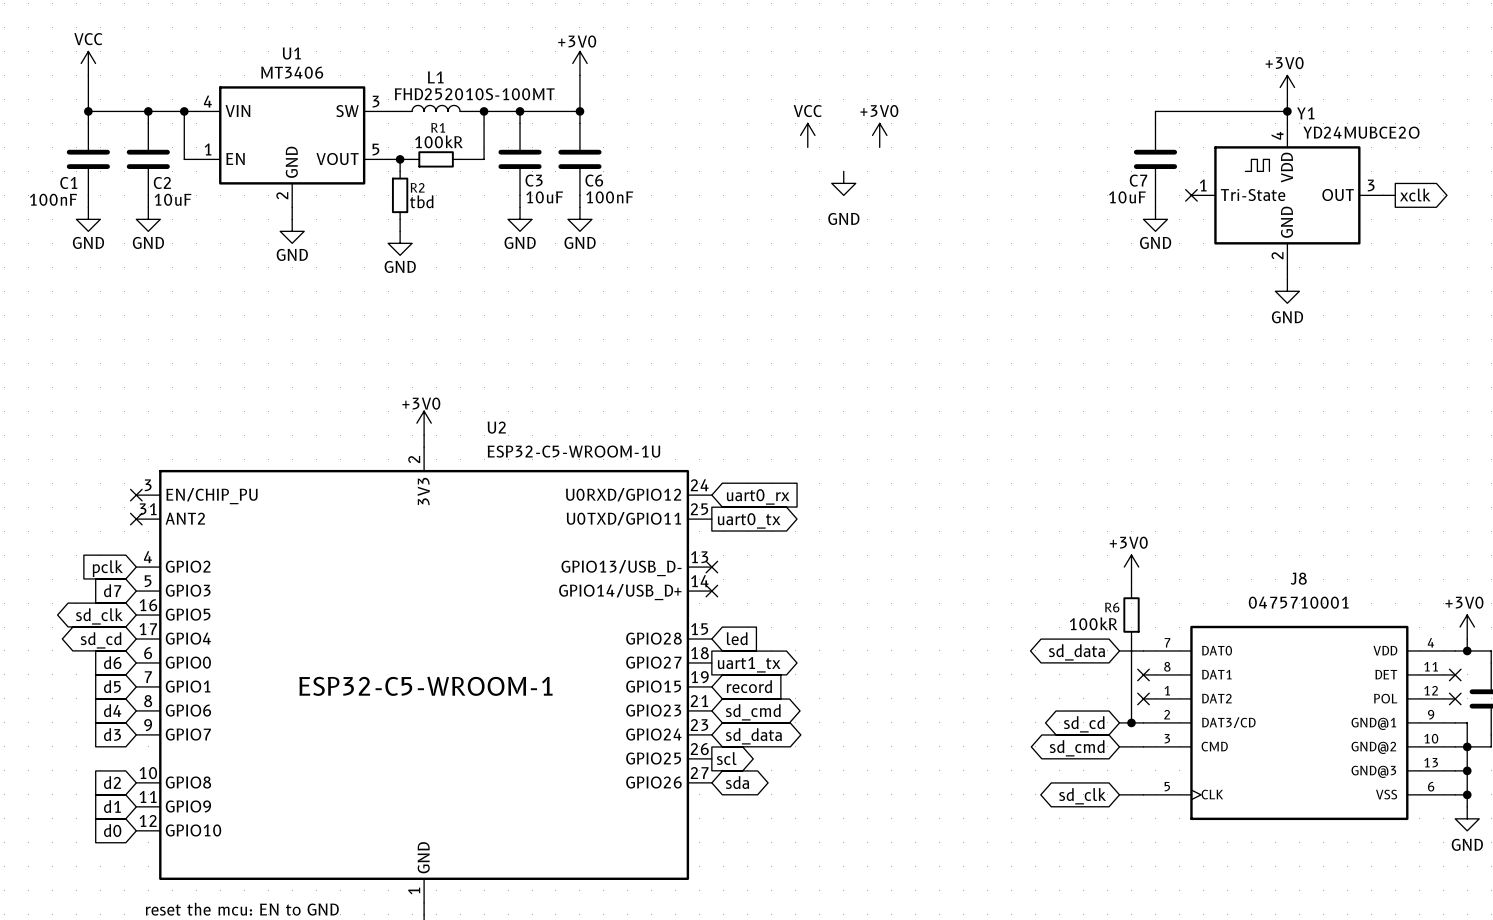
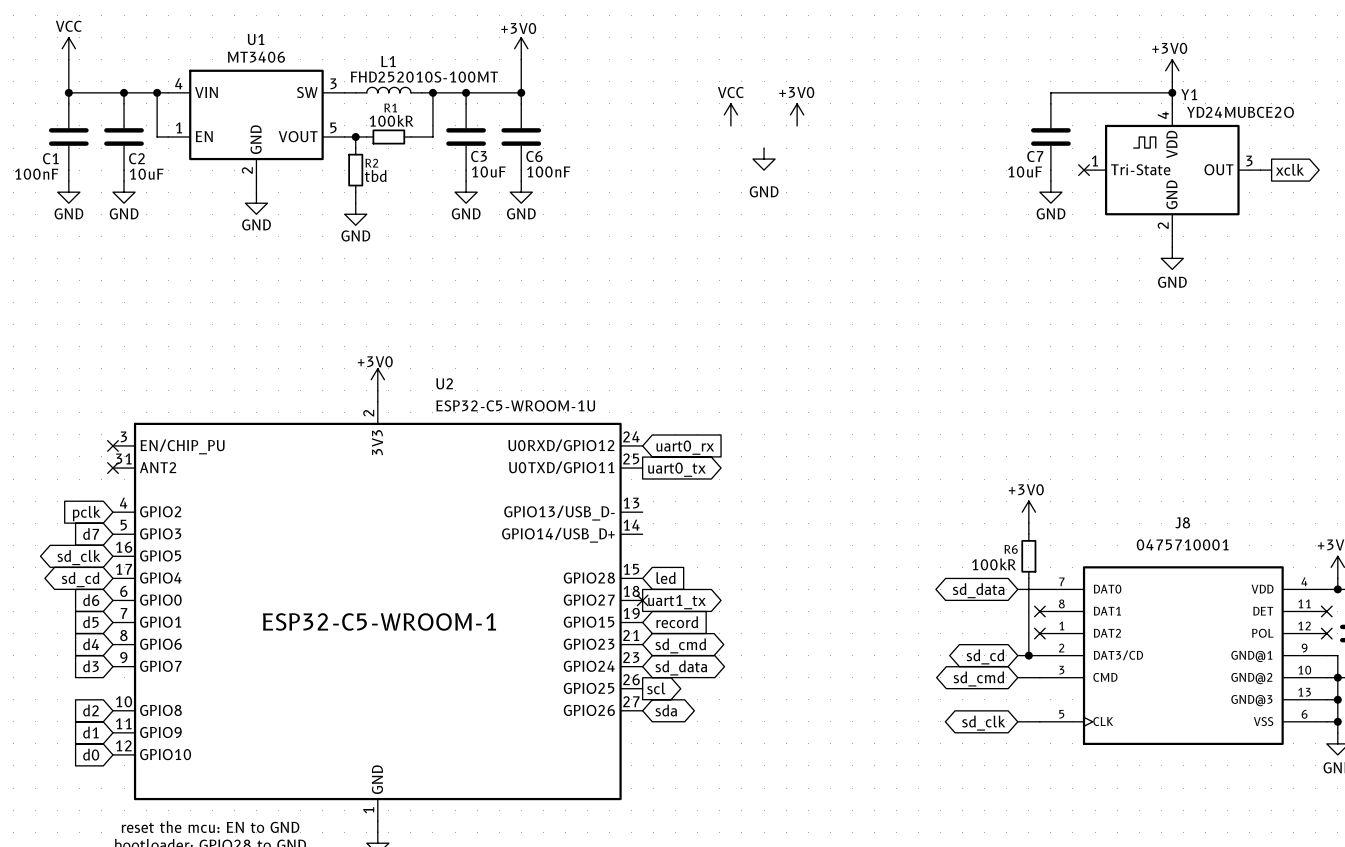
no-connect mark: (711, 567) -> none
no-connect mark: (711, 591) -> none
no-connect mark: none -> (642, 600)

